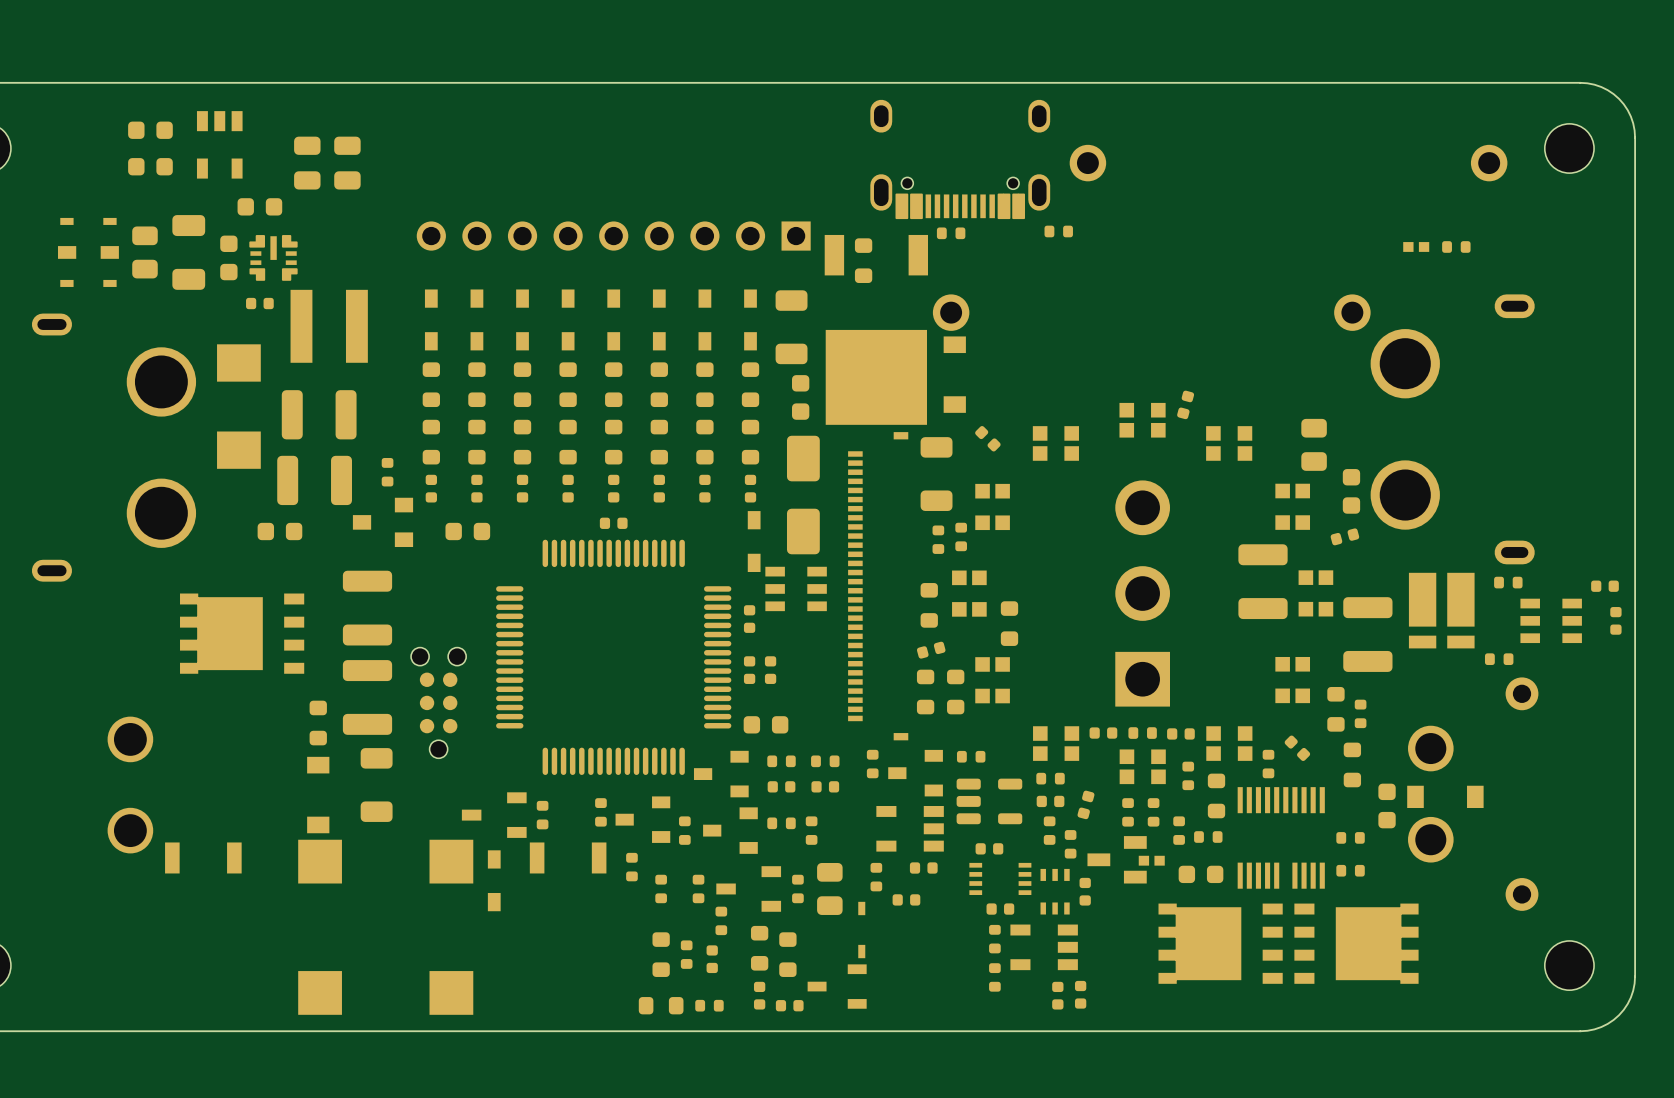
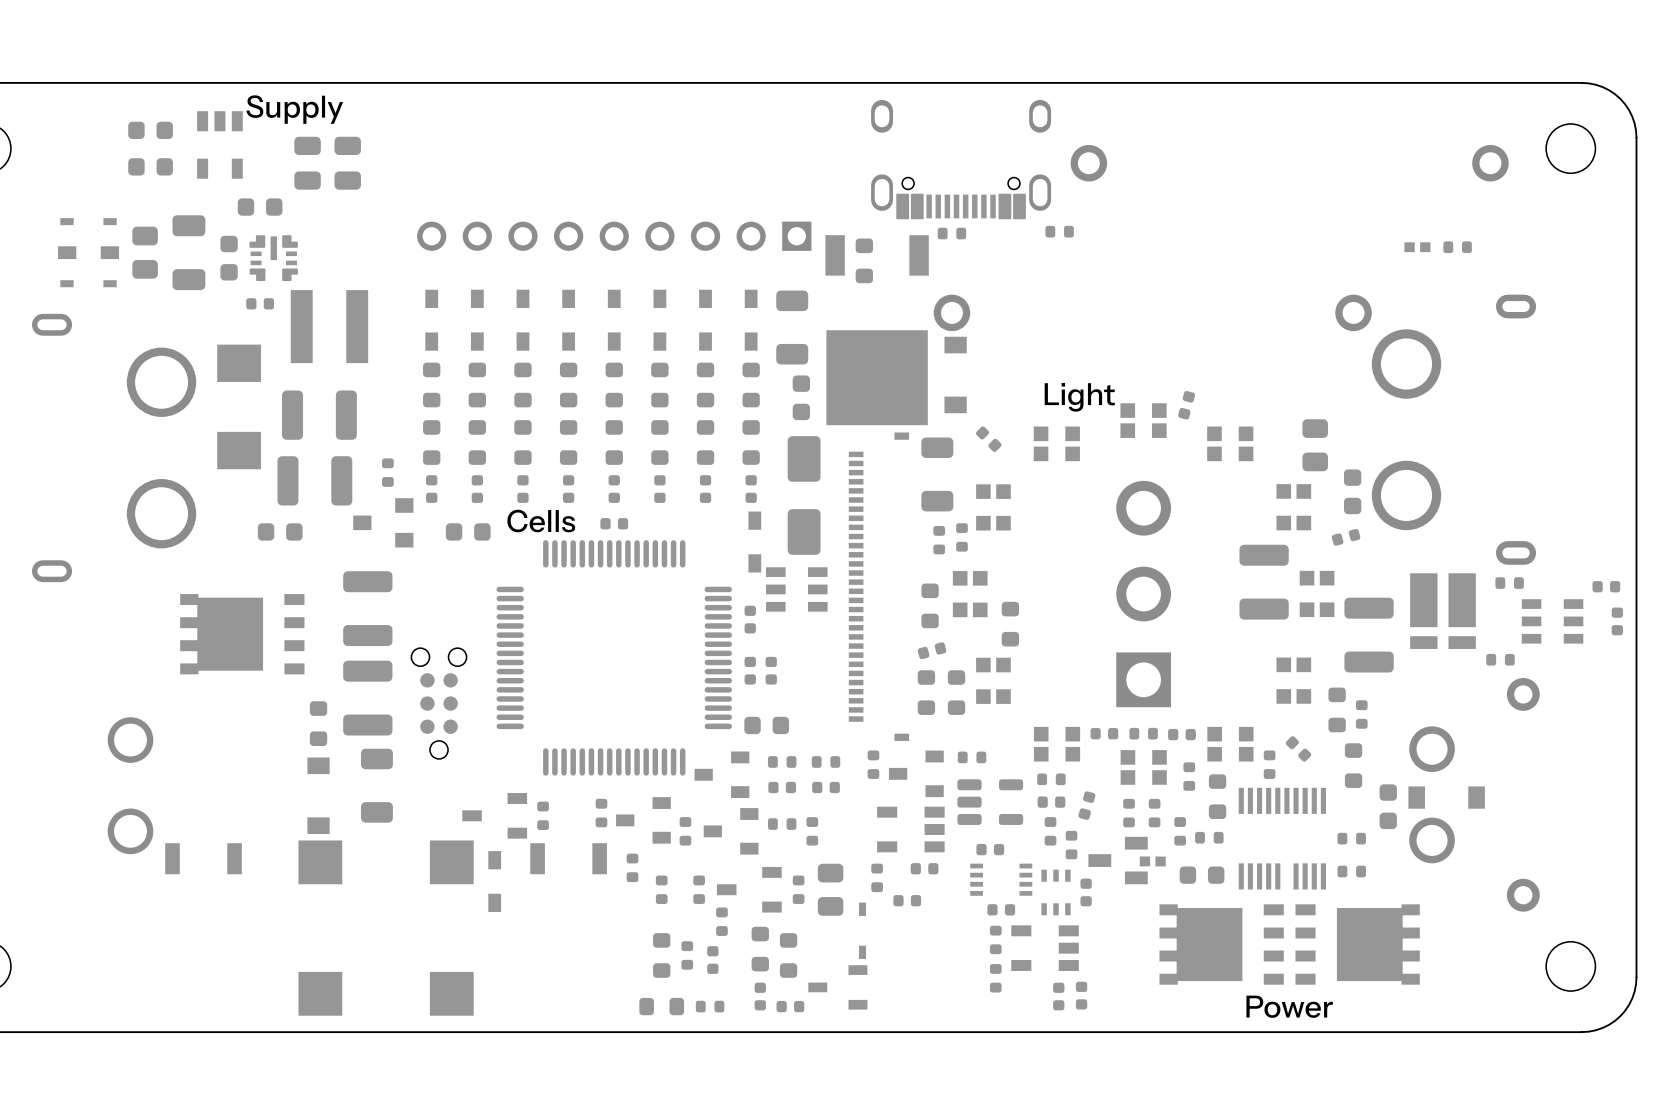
drawing: none -> [246, 95, 344, 124]
drawing: none -> [1044, 382, 1115, 412]
drawing: none -> [507, 509, 576, 533]
drawing: none -> [1246, 995, 1333, 1018]

